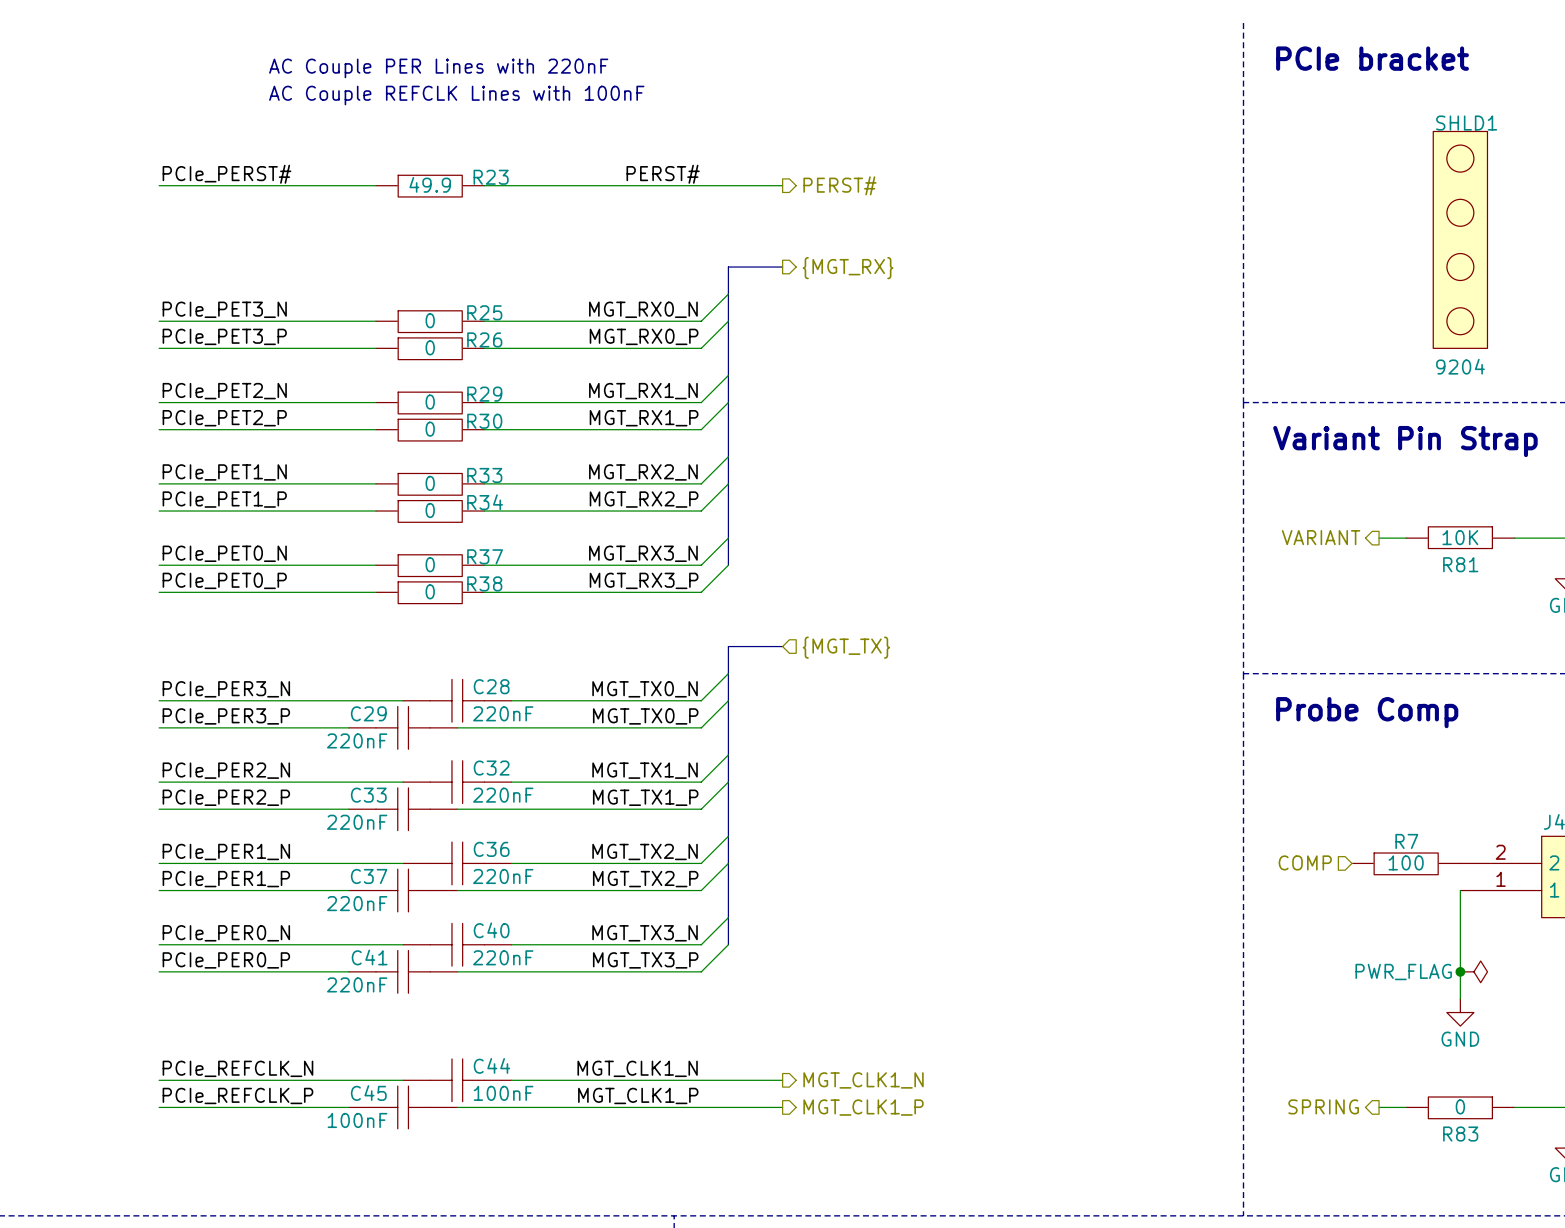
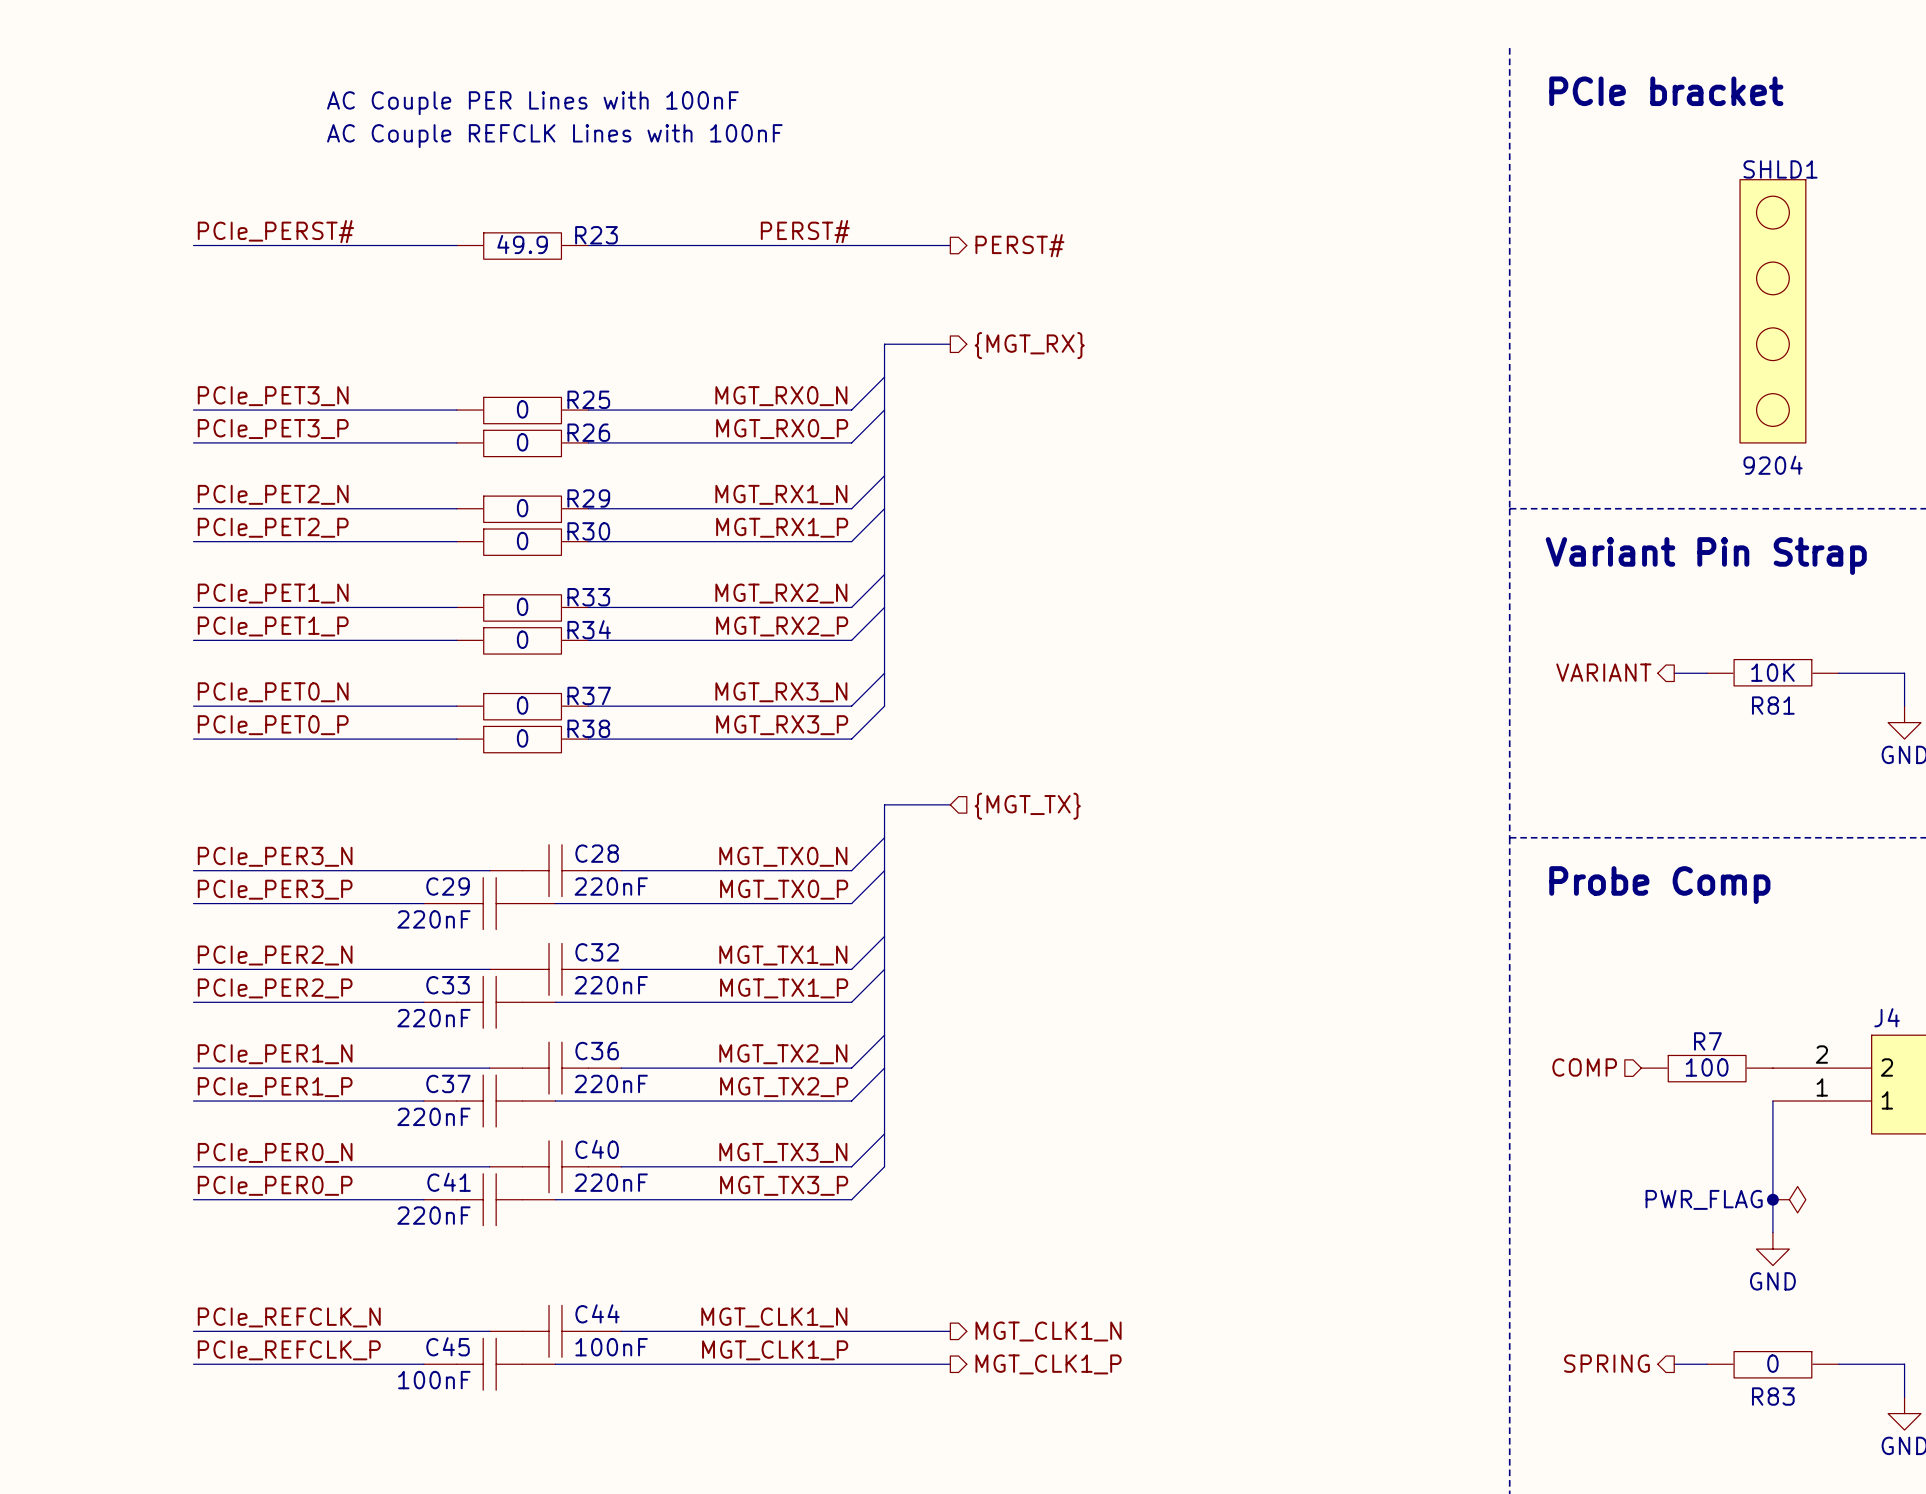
text: AC Couple PER Lines with 220nF (438, 68) -> AC Couple PER Lines with 100nF (532, 103)

